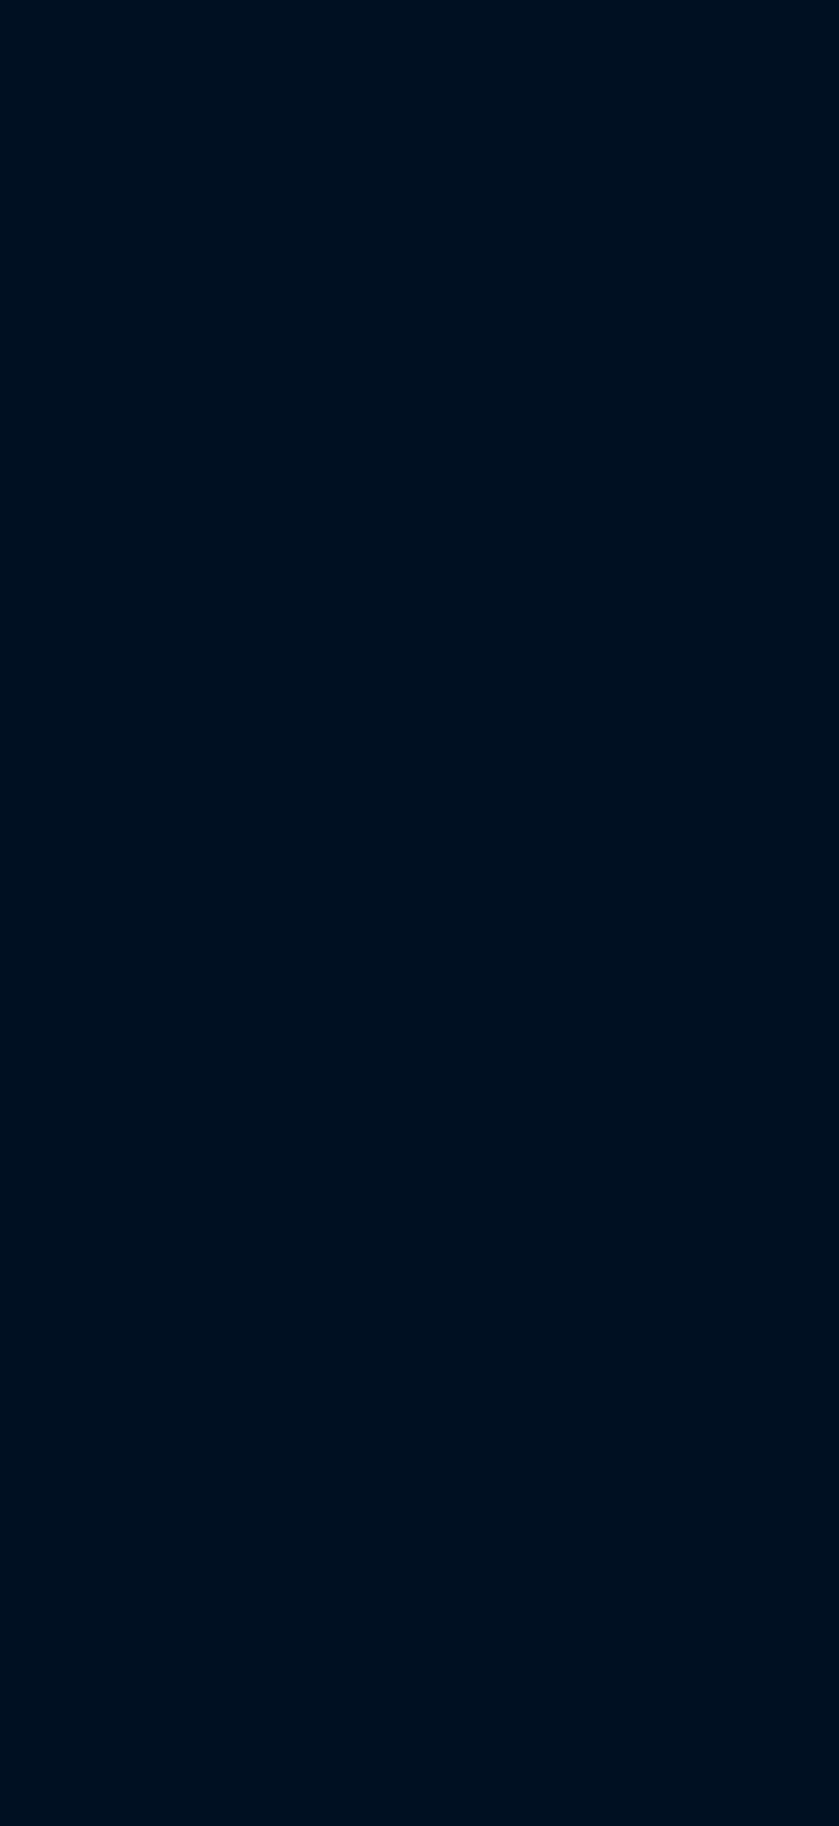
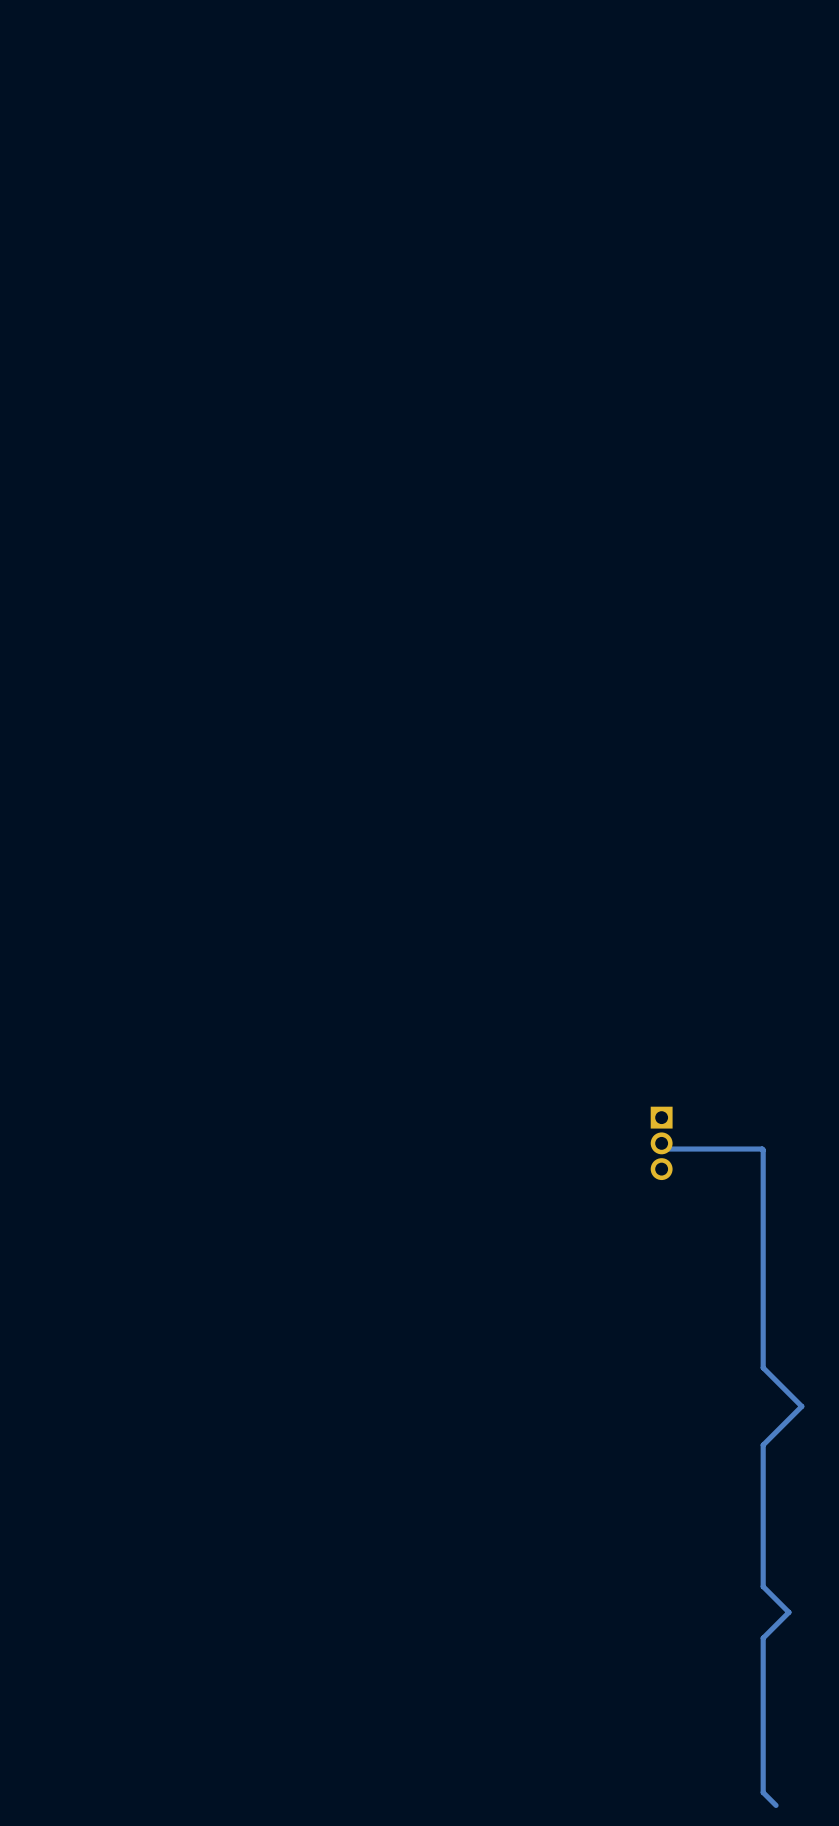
bottom track: none -> (661, 1143) (660, 1149) (763, 1150) (763, 1367) (801, 1406) (763, 1445) (763, 1586) (788, 1612) (763, 1638) (763, 1792) (776, 1805)
part: none -> (661, 1143)

